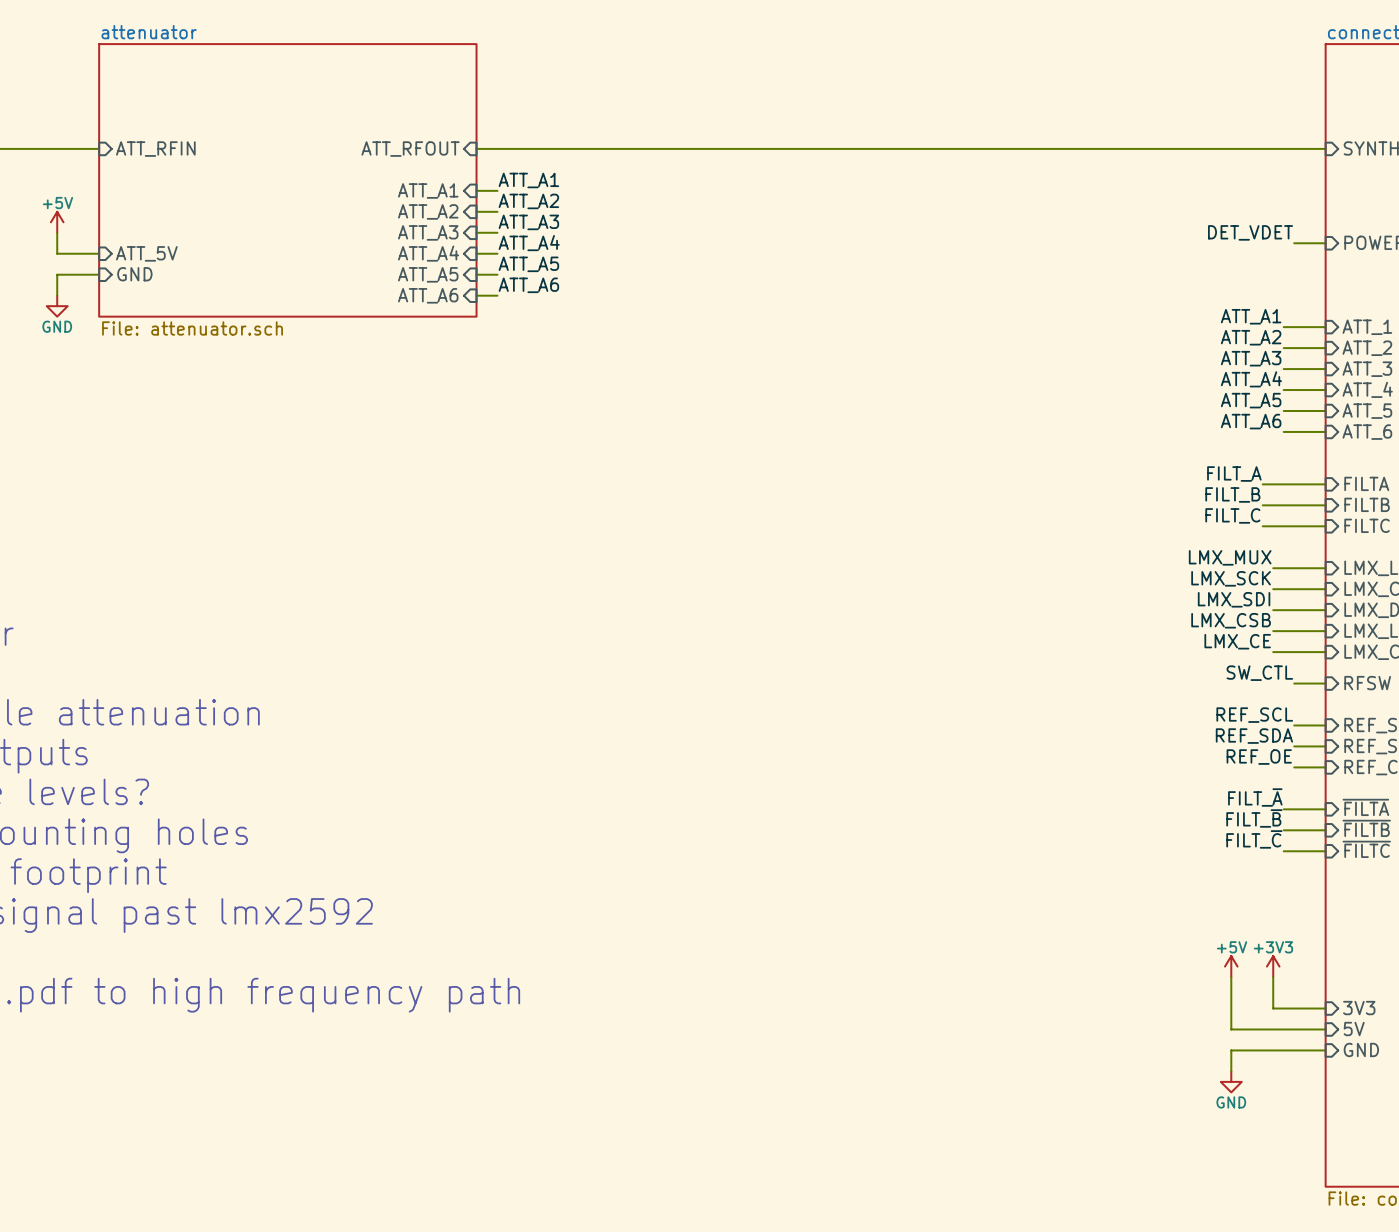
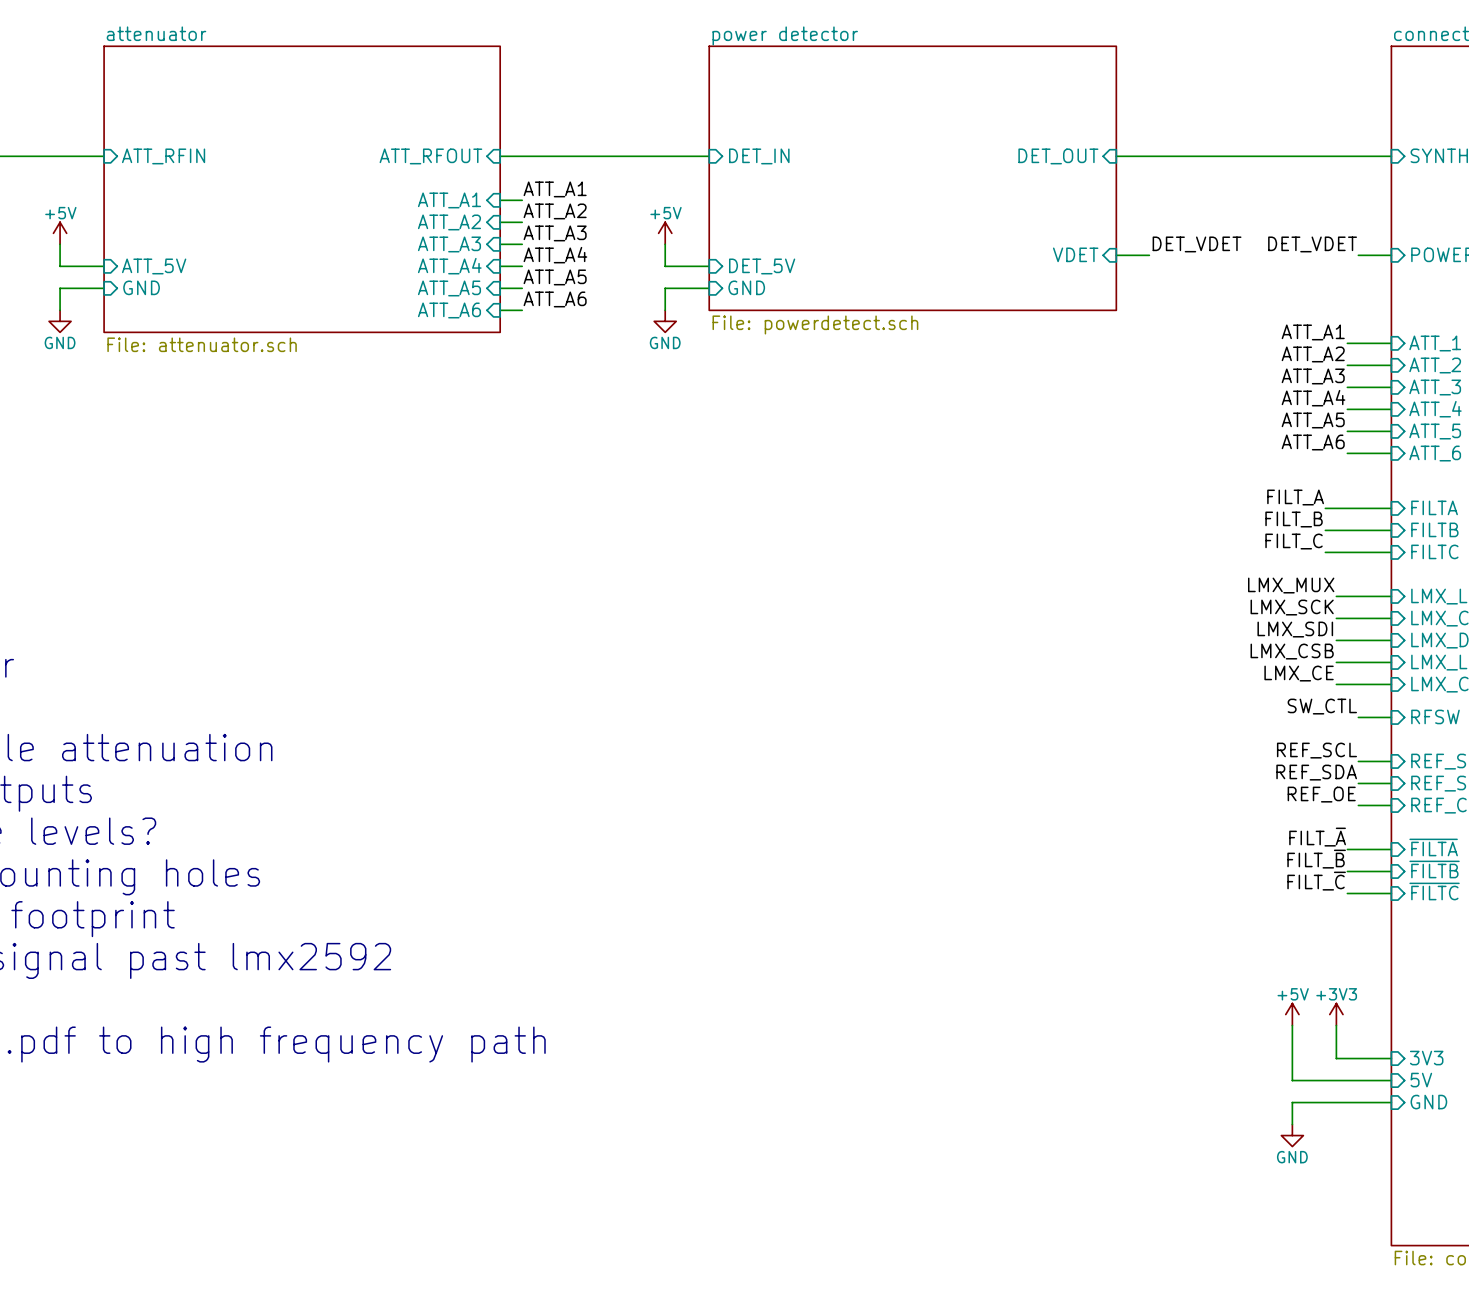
wire: (675, 148) (1063, 148) -> none
sheet pin: none -> DET_IN (759, 156)
sheet pin: none -> DET_OUT (1058, 156)
sheet power detector: none -> File: powerdetect.sch (912, 178)
power symbol: none -> +5V (665, 233)
wire: none -> (665, 244) (665, 266) (709, 266)
label: none -> DET_VDET (1197, 244)
sheet pin: none -> VDET (1075, 254)
wire: none -> (1116, 255) (1149, 255)
sheet pin: none -> DET_5V (762, 266)
wire: none -> (709, 288) (665, 288) (665, 310)
sheet pin: none -> GND (746, 287)
power symbol: none -> GND (665, 321)

